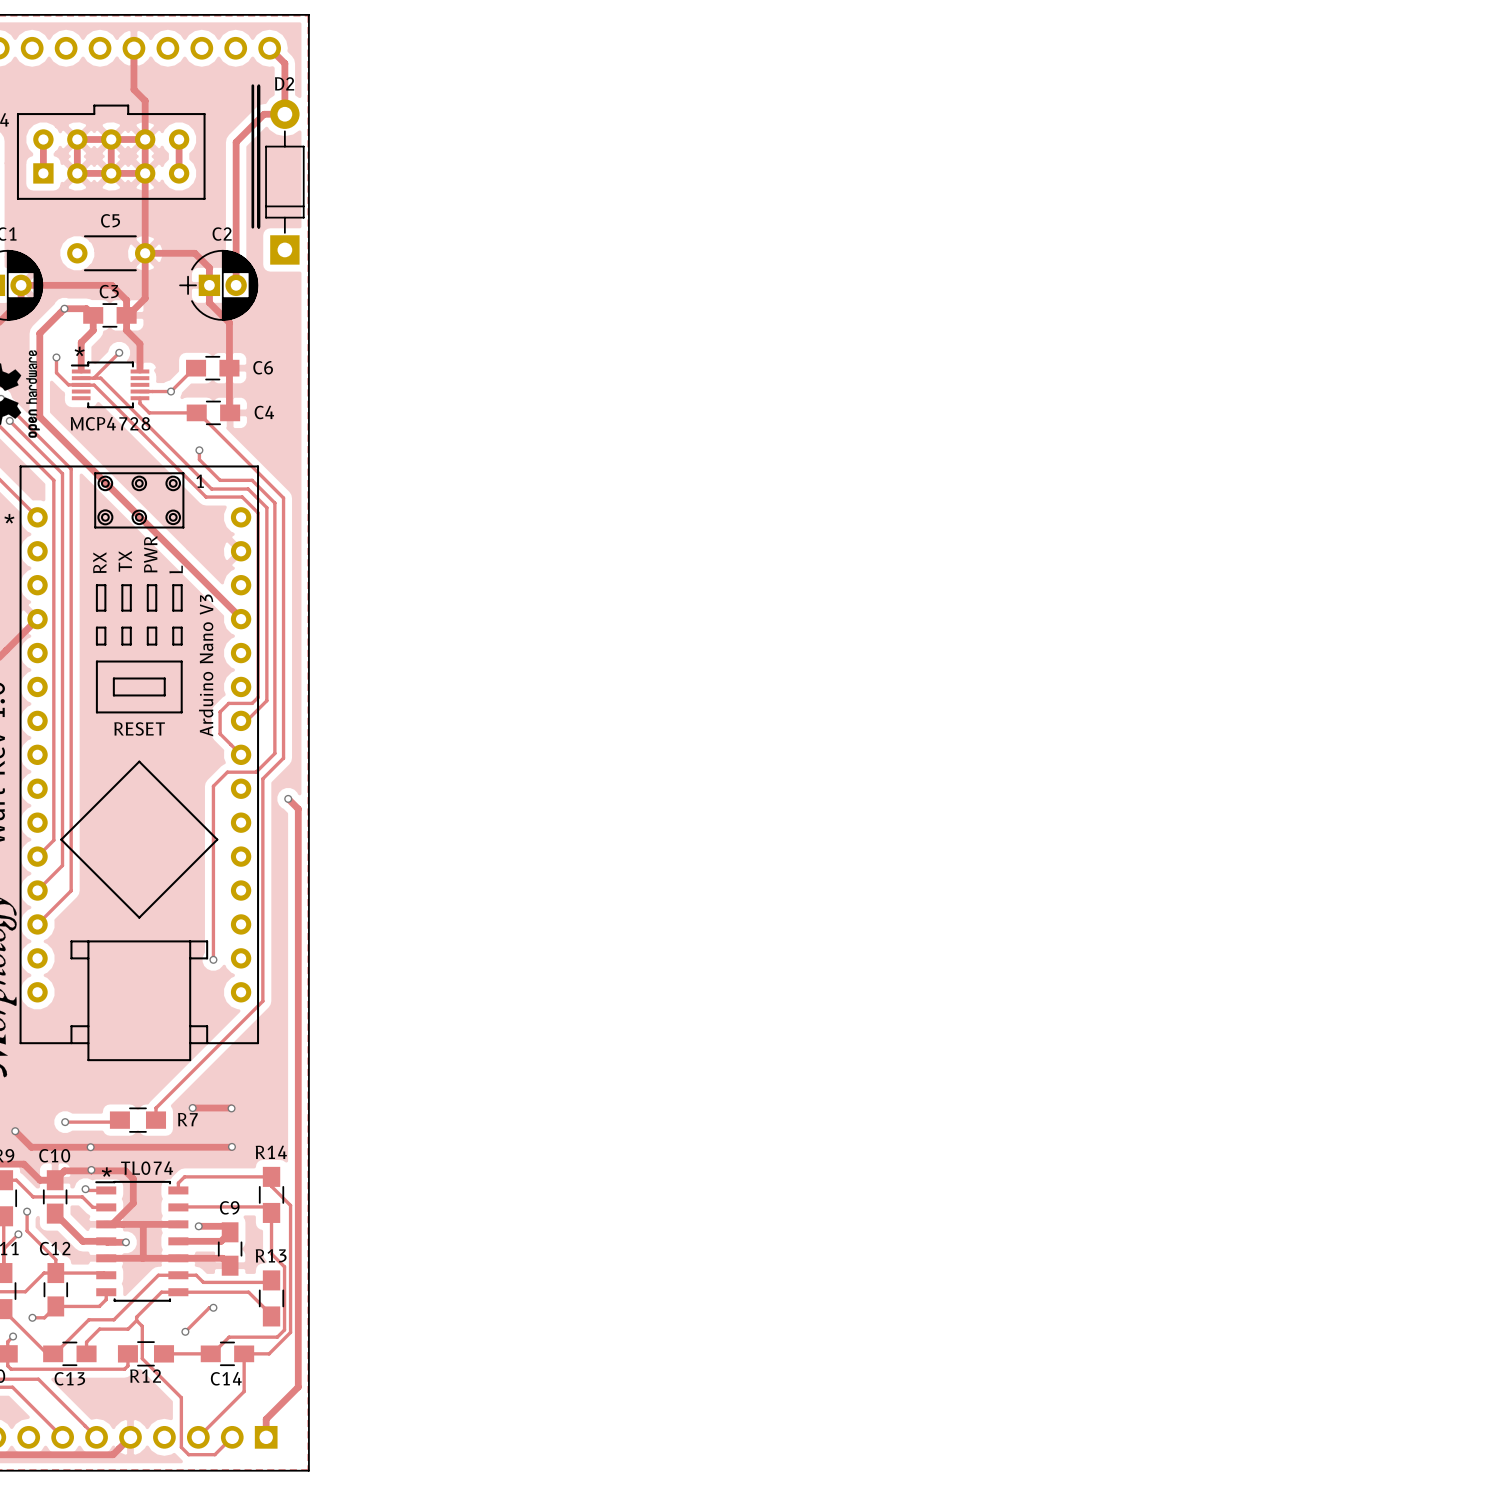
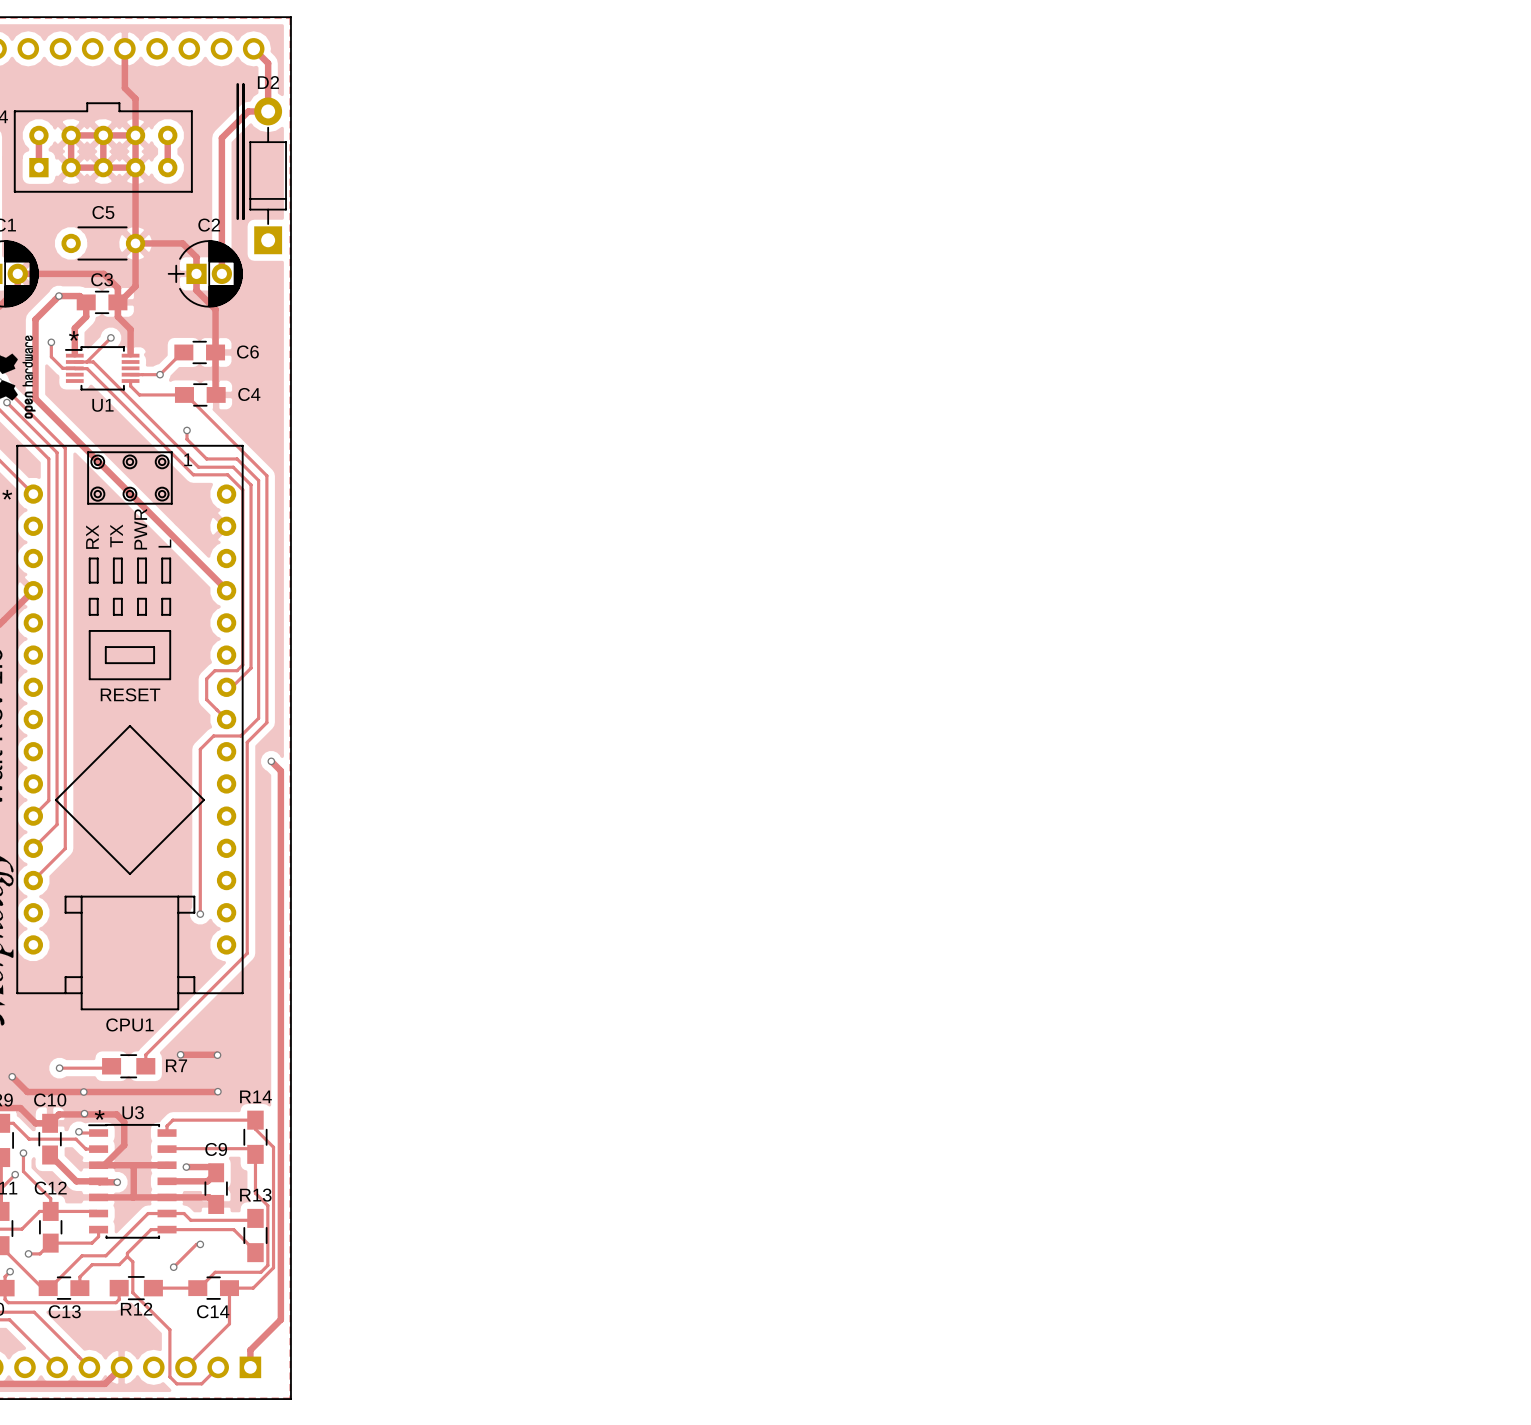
MCP4728 name: MCP4728 (110, 423) -> U1 (102, 405)
Arduino Nano V3 name: Arduino Nano V3 (206, 665) -> CPU1 (129, 1024)
TL074 name: TL074 (147, 1168) -> U3 (133, 1112)

